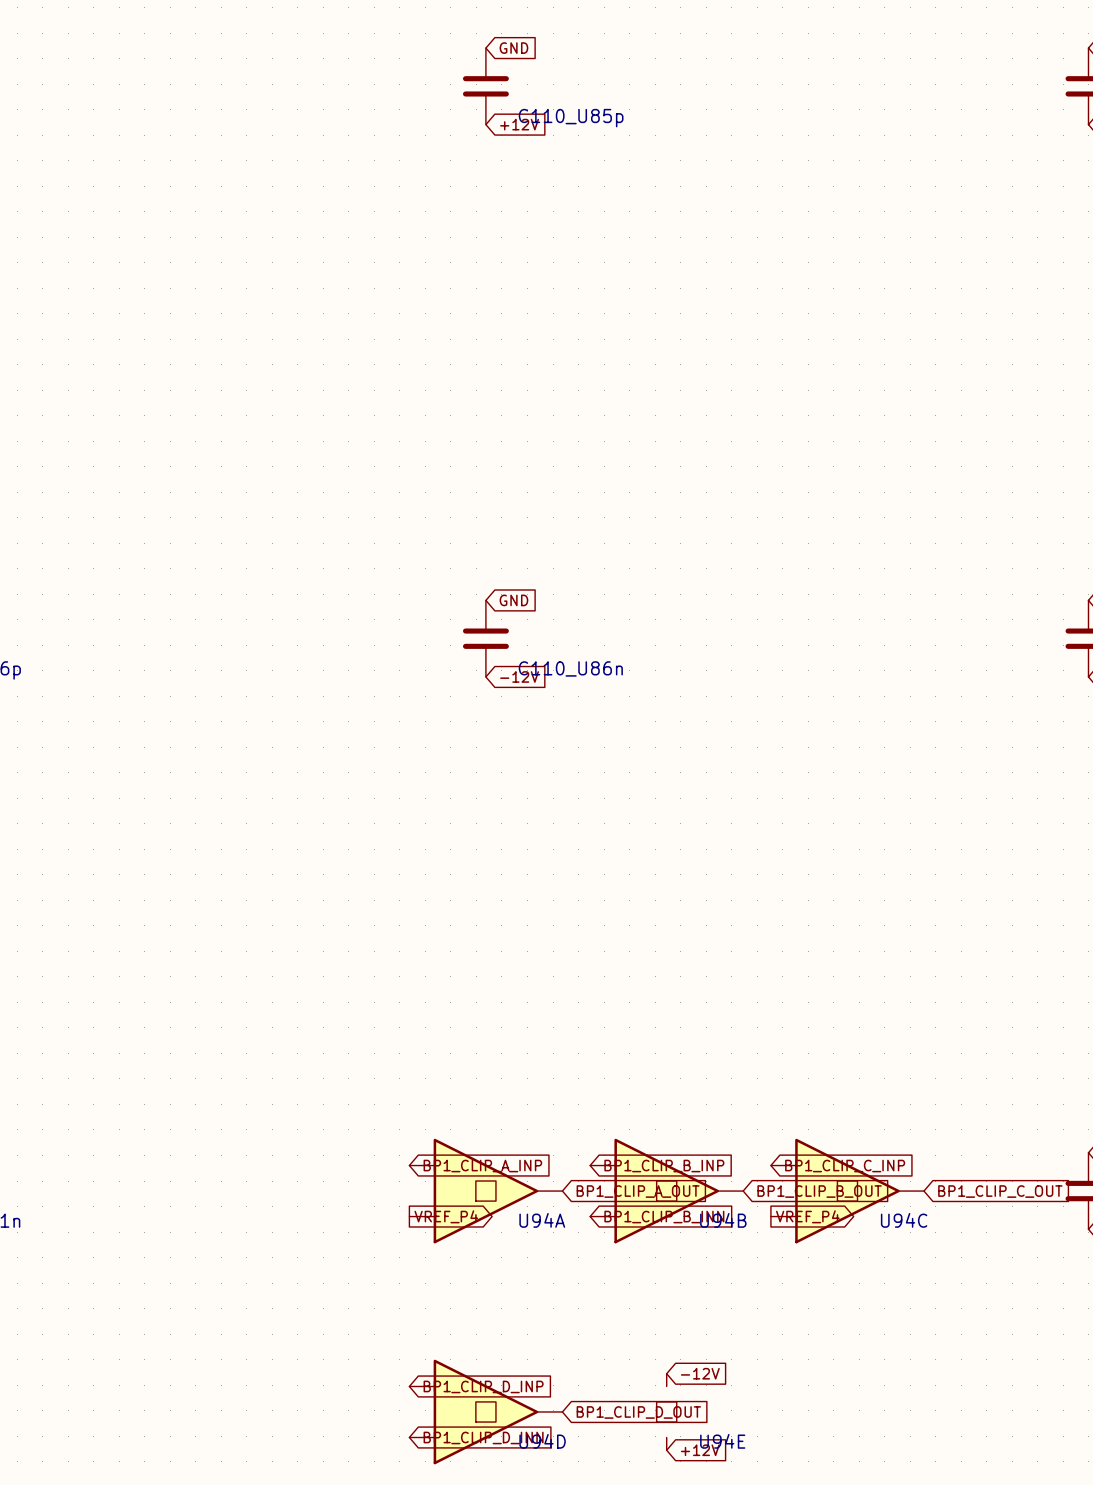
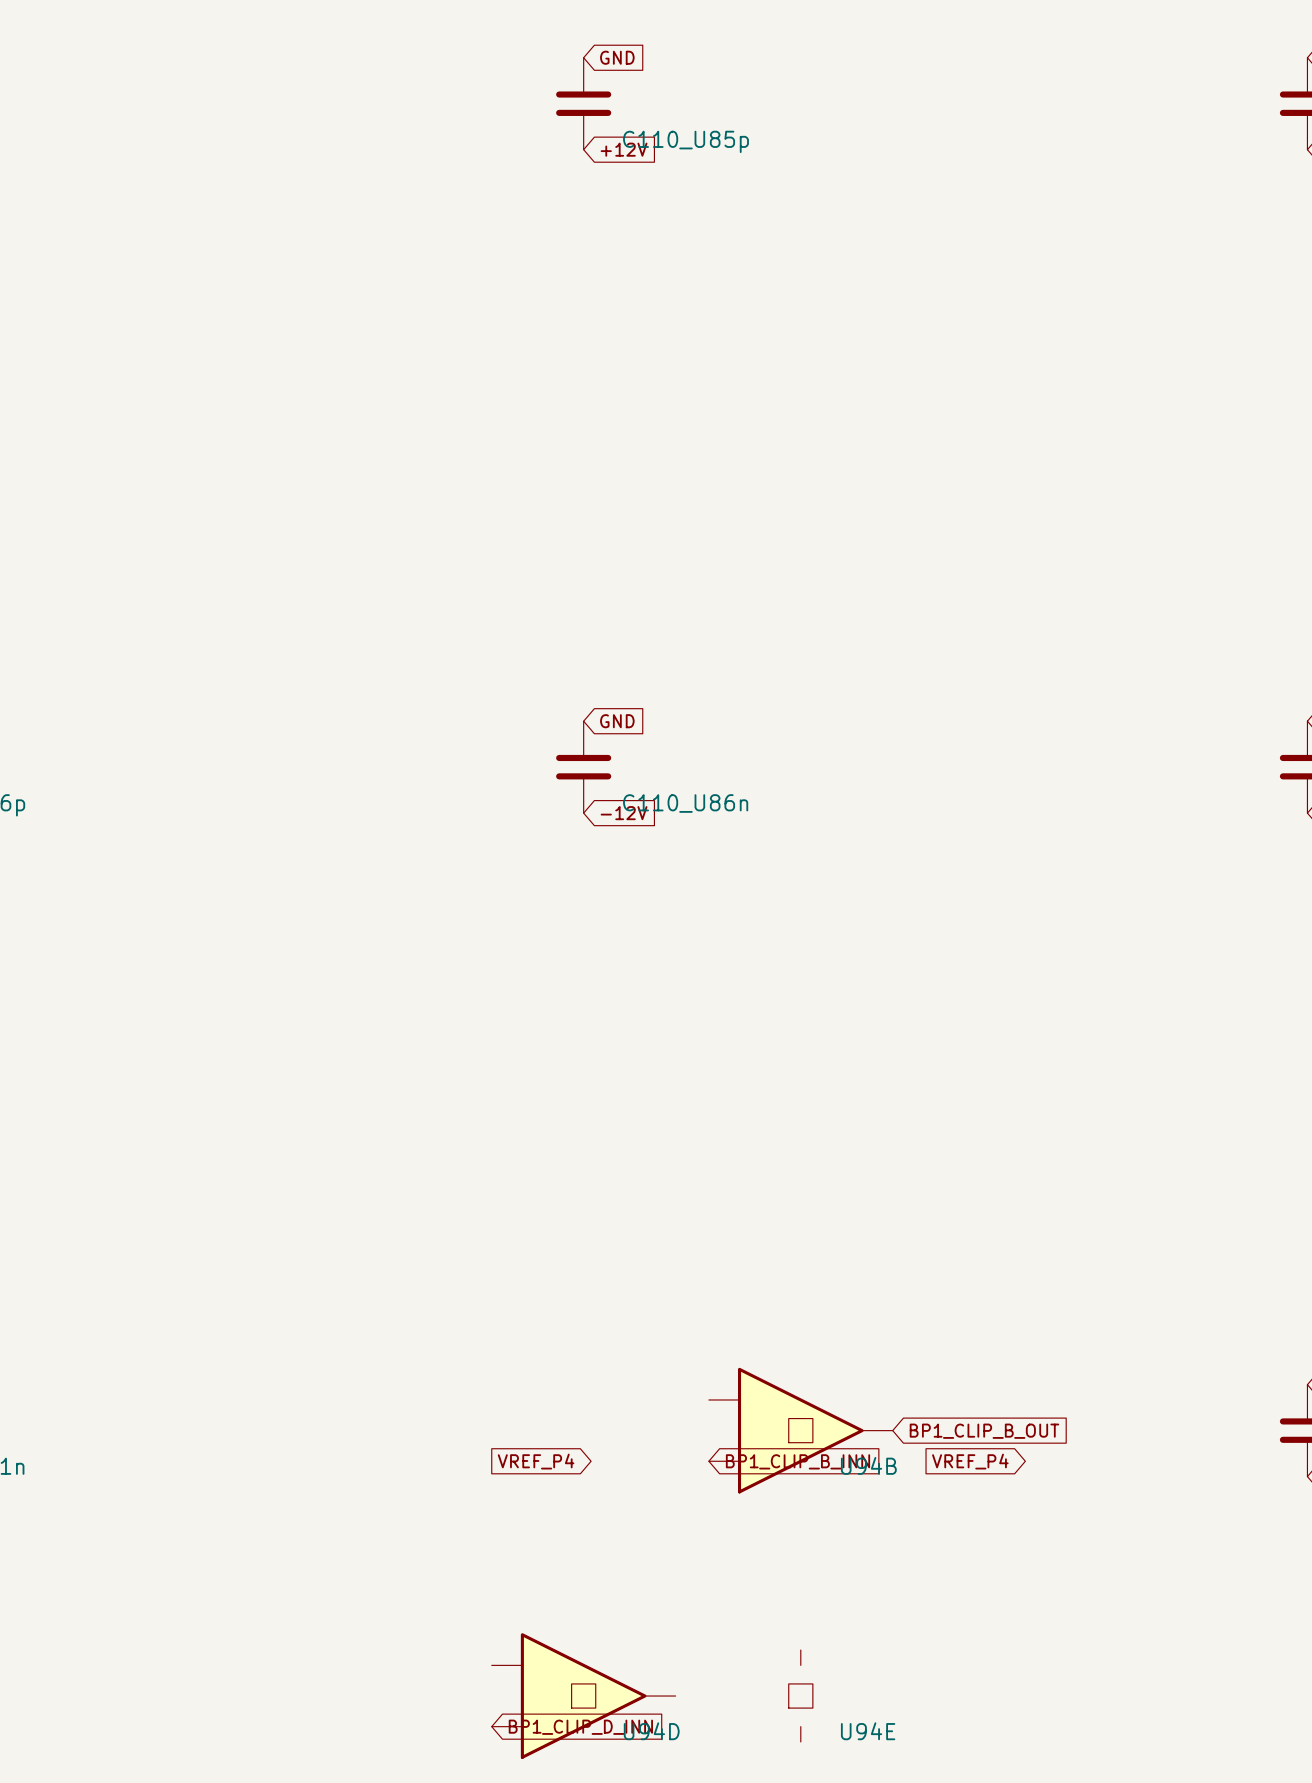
global label: BP1_CLIP_A_INP (482, 1166) -> none
global label: BP1_CLIP_B_INP (664, 1166) -> none
global label: BP1_CLIP_C_INP (845, 1166) -> none
U94A: (485, 1191) -> none
global label: BP1_CLIP_A_OUT (638, 1191) -> none
U94C: (847, 1191) -> none
global label: BP1_CLIP_C_OUT (1000, 1191) -> none
global label: -12V (700, 1373) -> none
global label: BP1_CLIP_D_INP (483, 1386) -> none
global label: BP1_CLIP_D_OUT (638, 1412) -> none
global label: +12V (700, 1450) -> none

